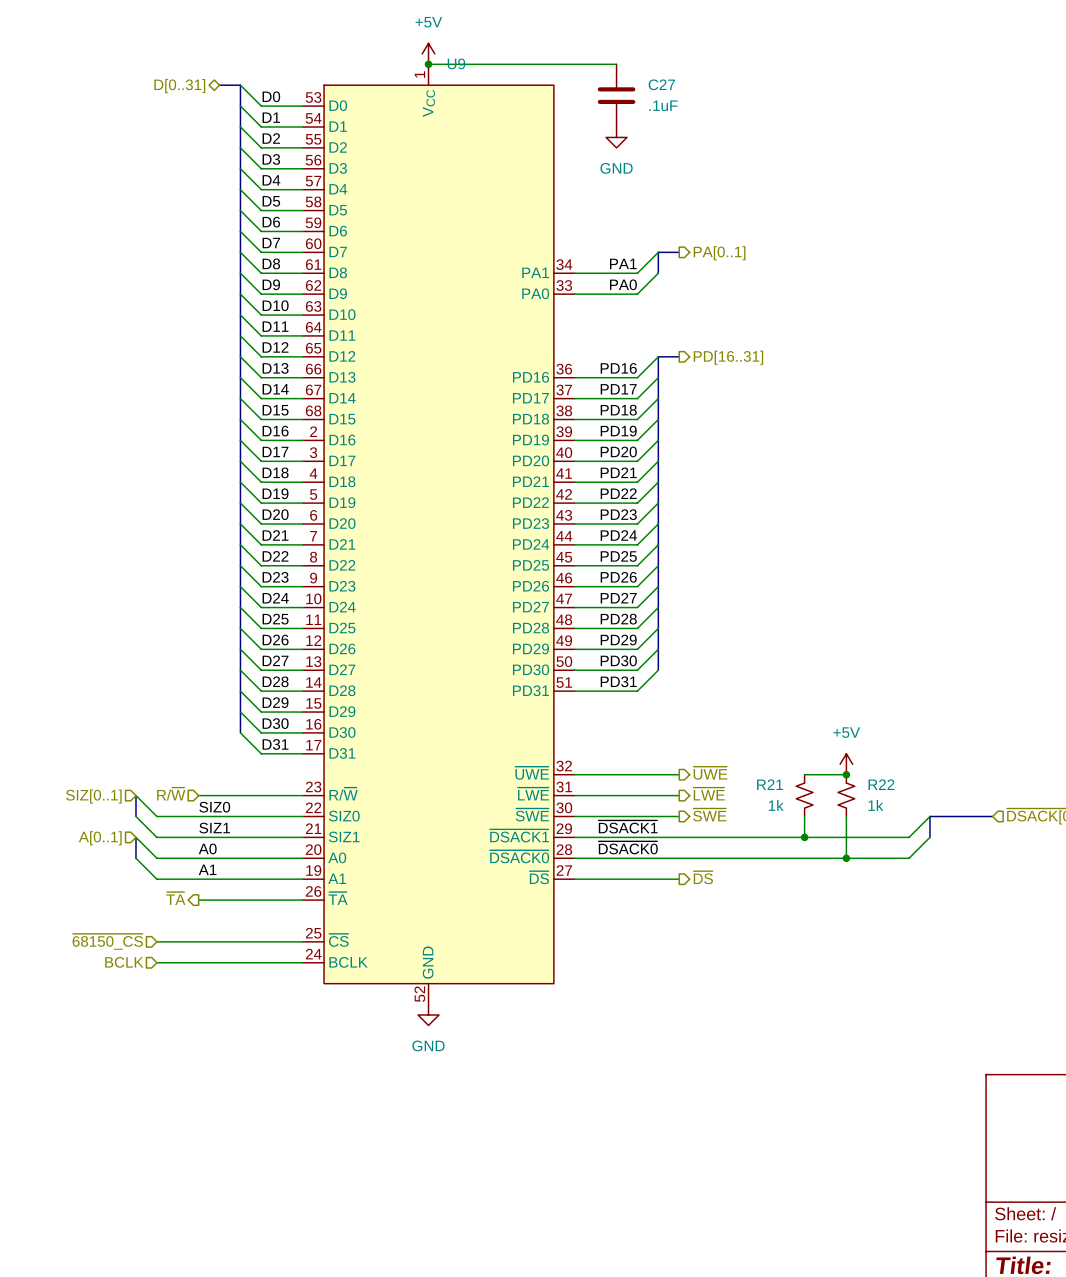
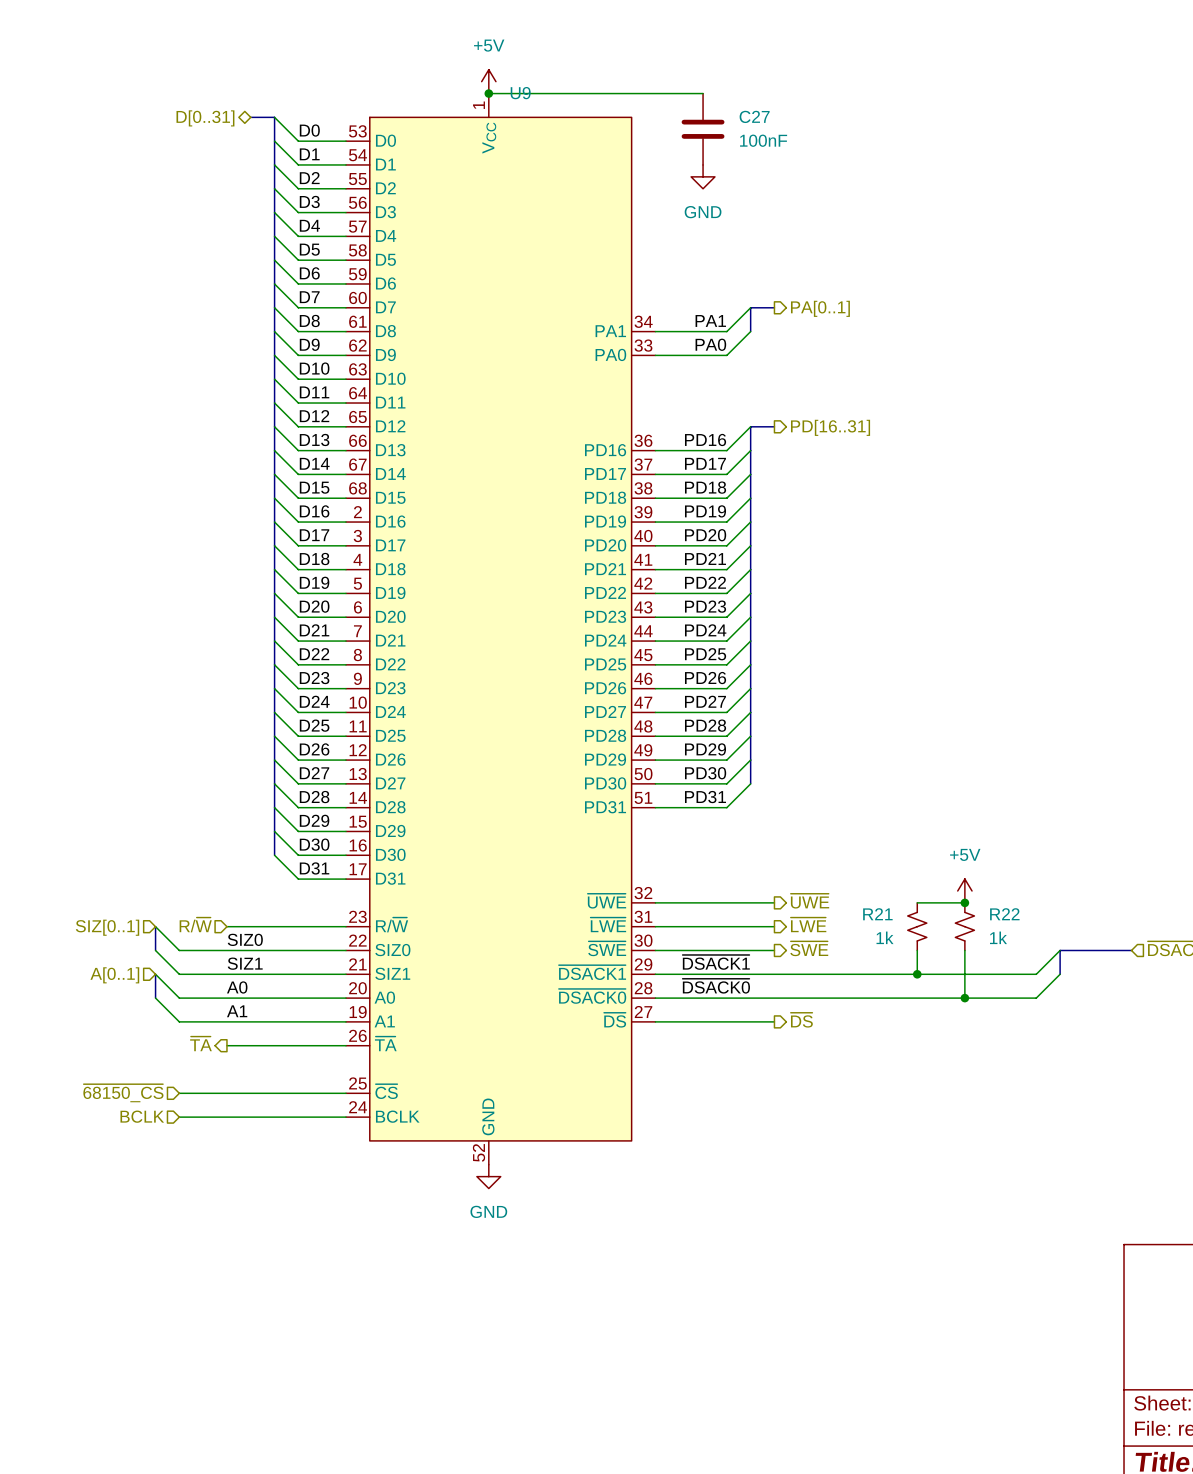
C27 value: .1uF (663, 105) -> 100nF (763, 140)

